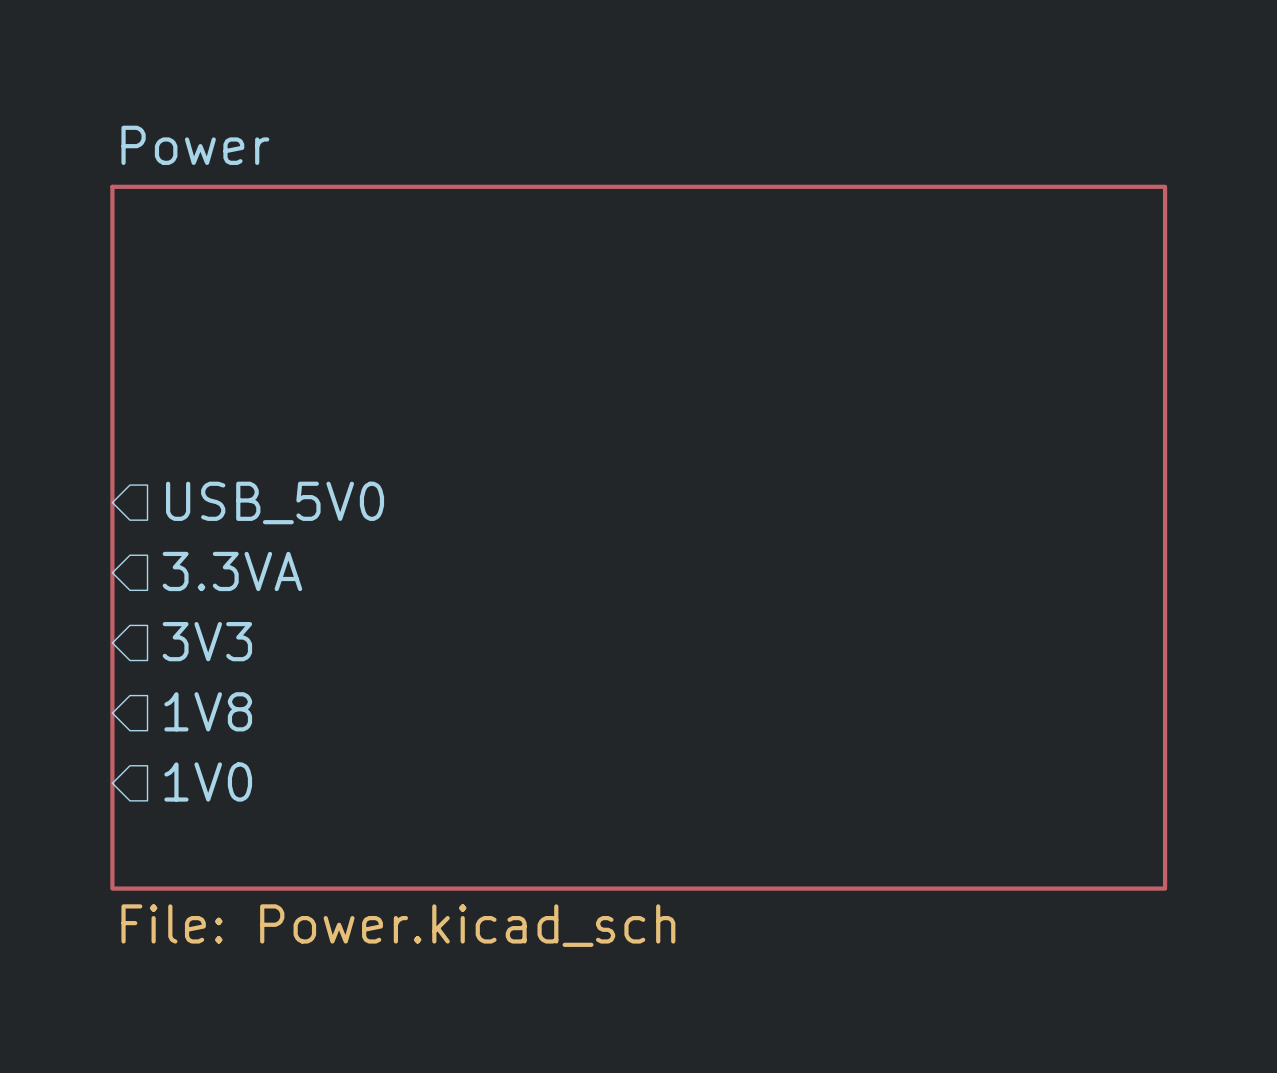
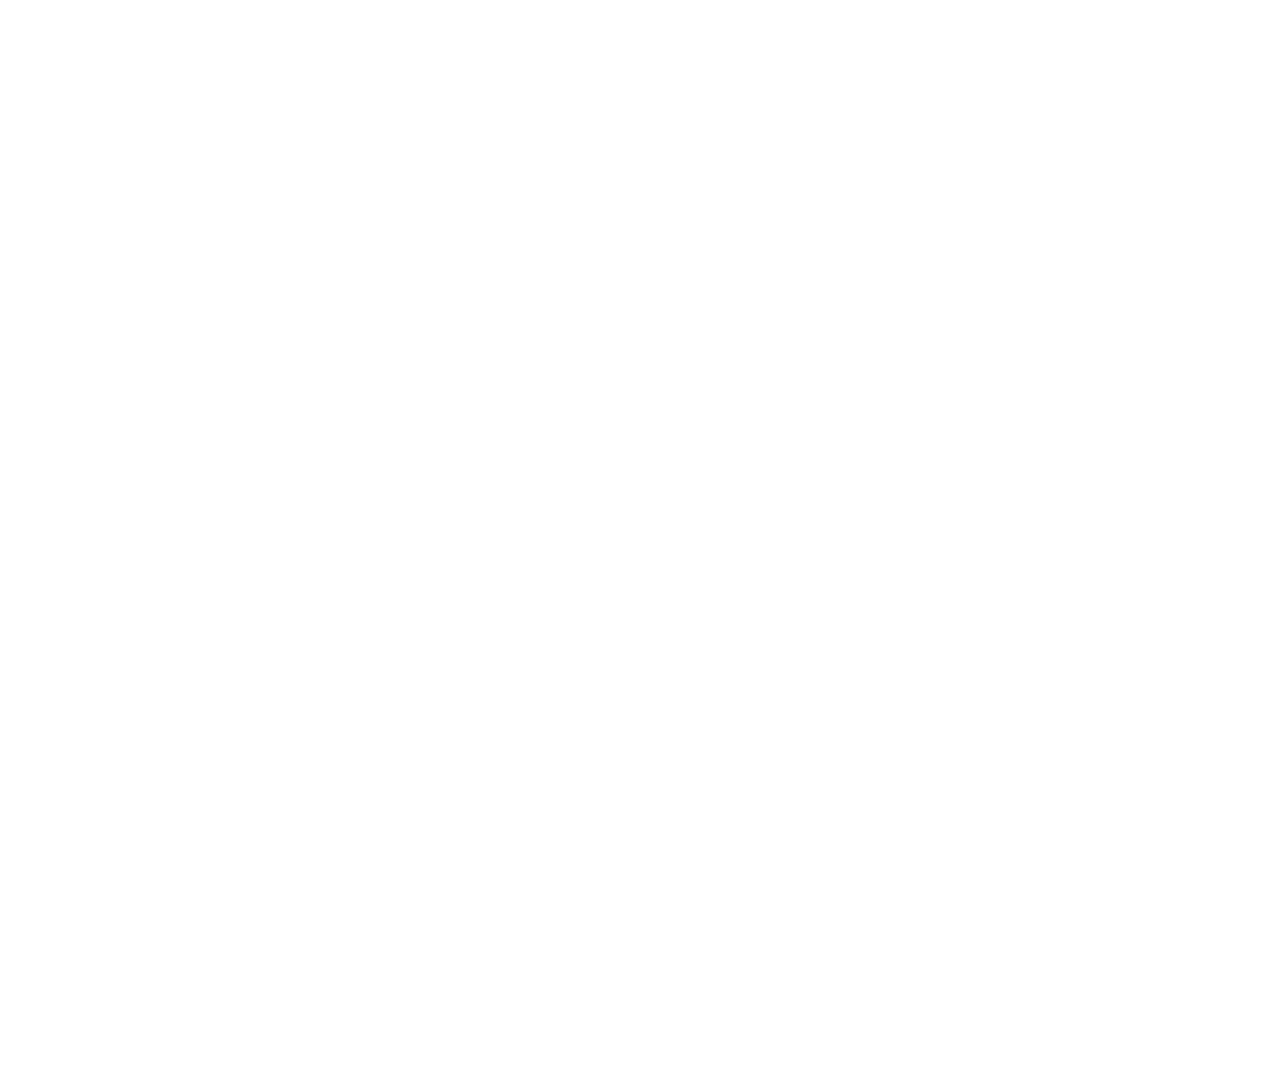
sheet pin: USB_5V0 (275, 502) -> none
sheet Power: File: Power.kicad_sch (638, 537) -> none
sheet pin: 3.3VA (232, 571) -> none
sheet pin: 3V3 (207, 641) -> none
sheet pin: 1V8 (208, 711) -> none
sheet pin: 1V0 (208, 782) -> none

